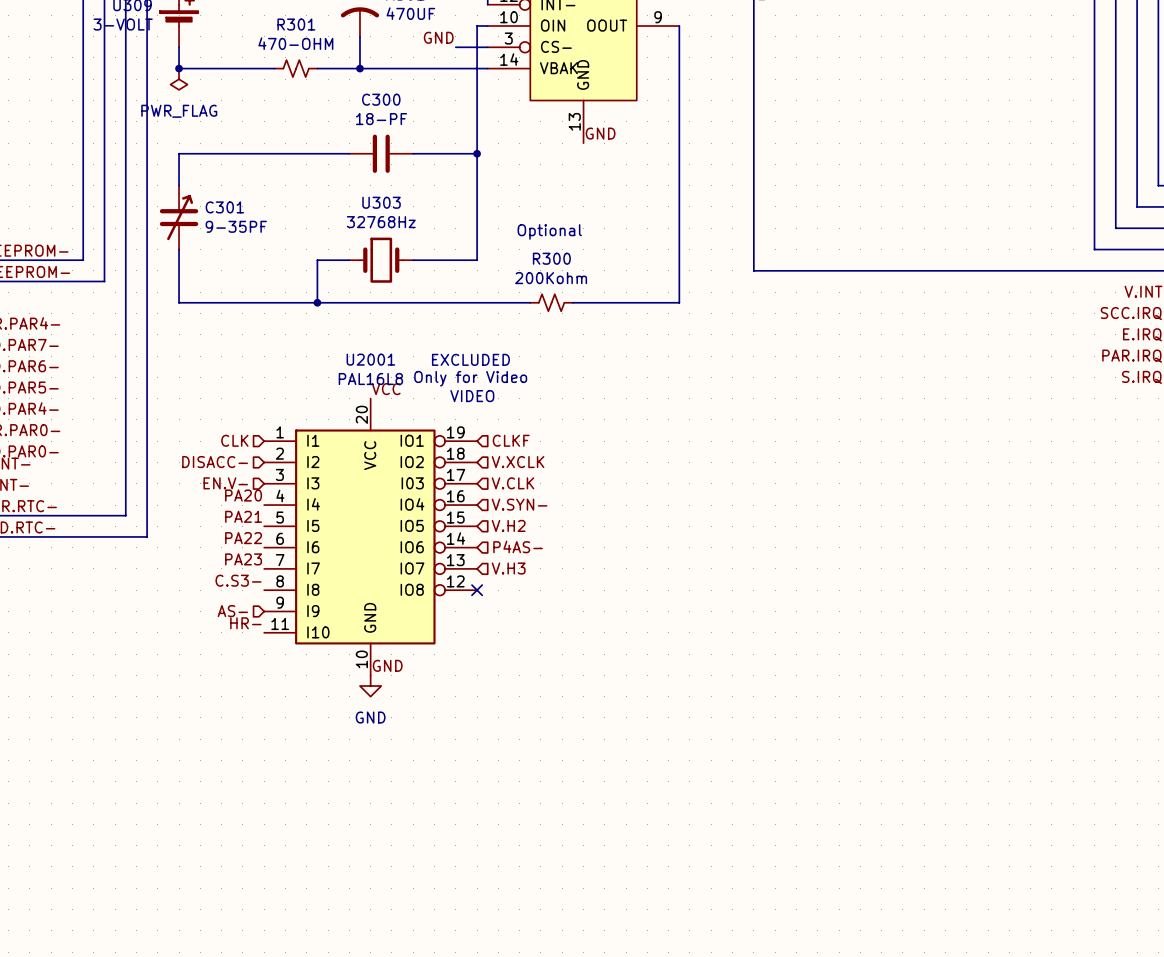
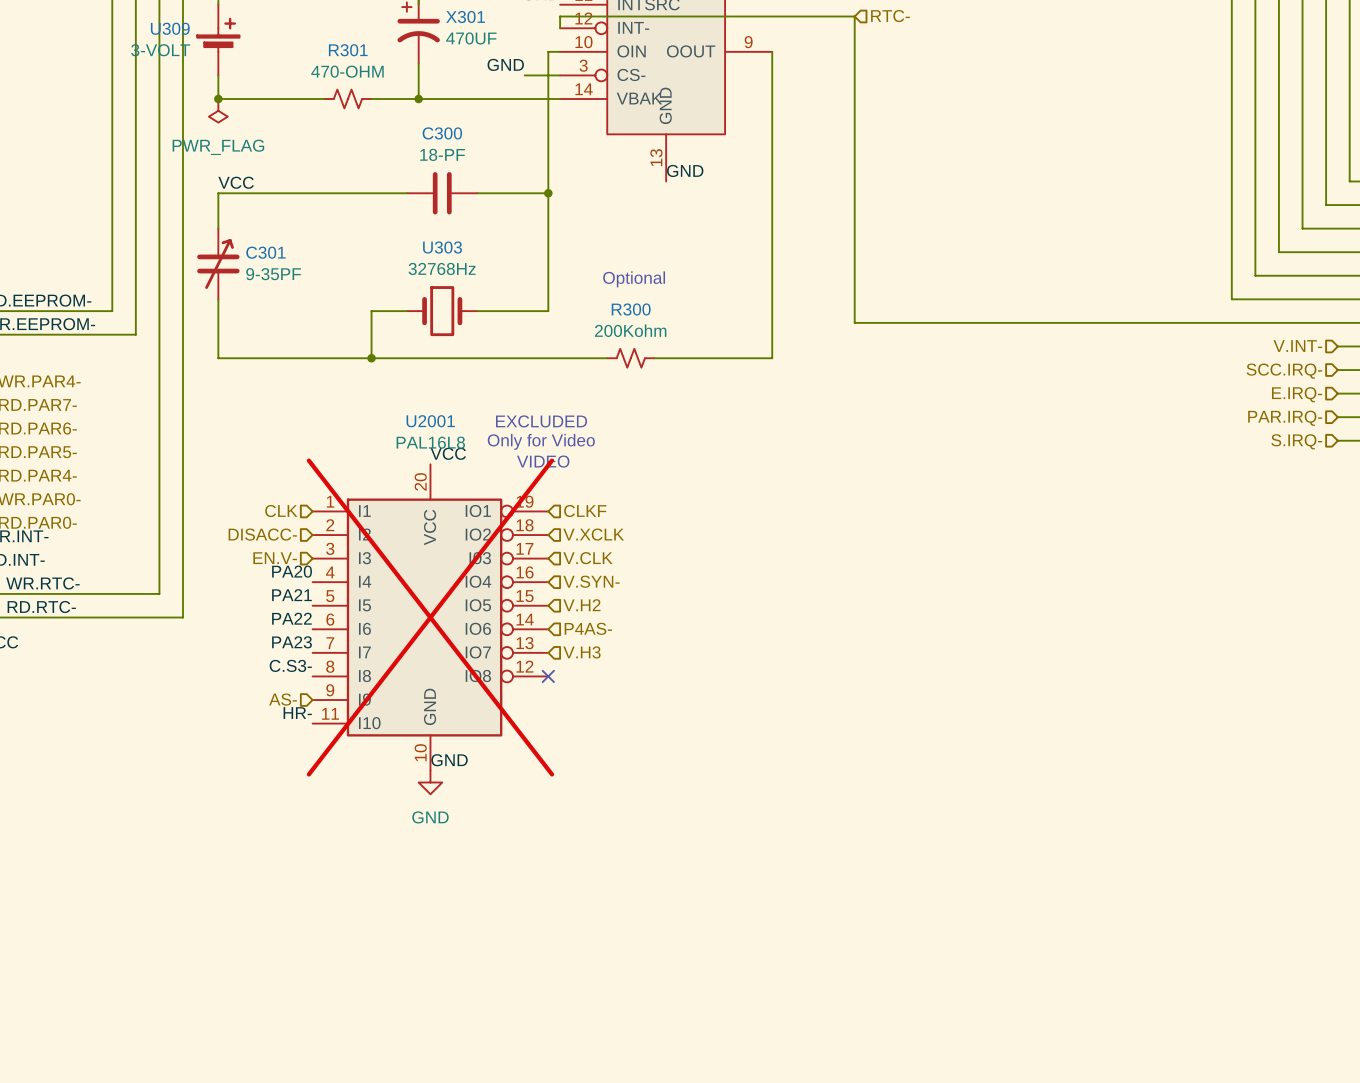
label: none -> VCC (236, 182)
U2001 do-not-place cross: none -> (430, 617)

